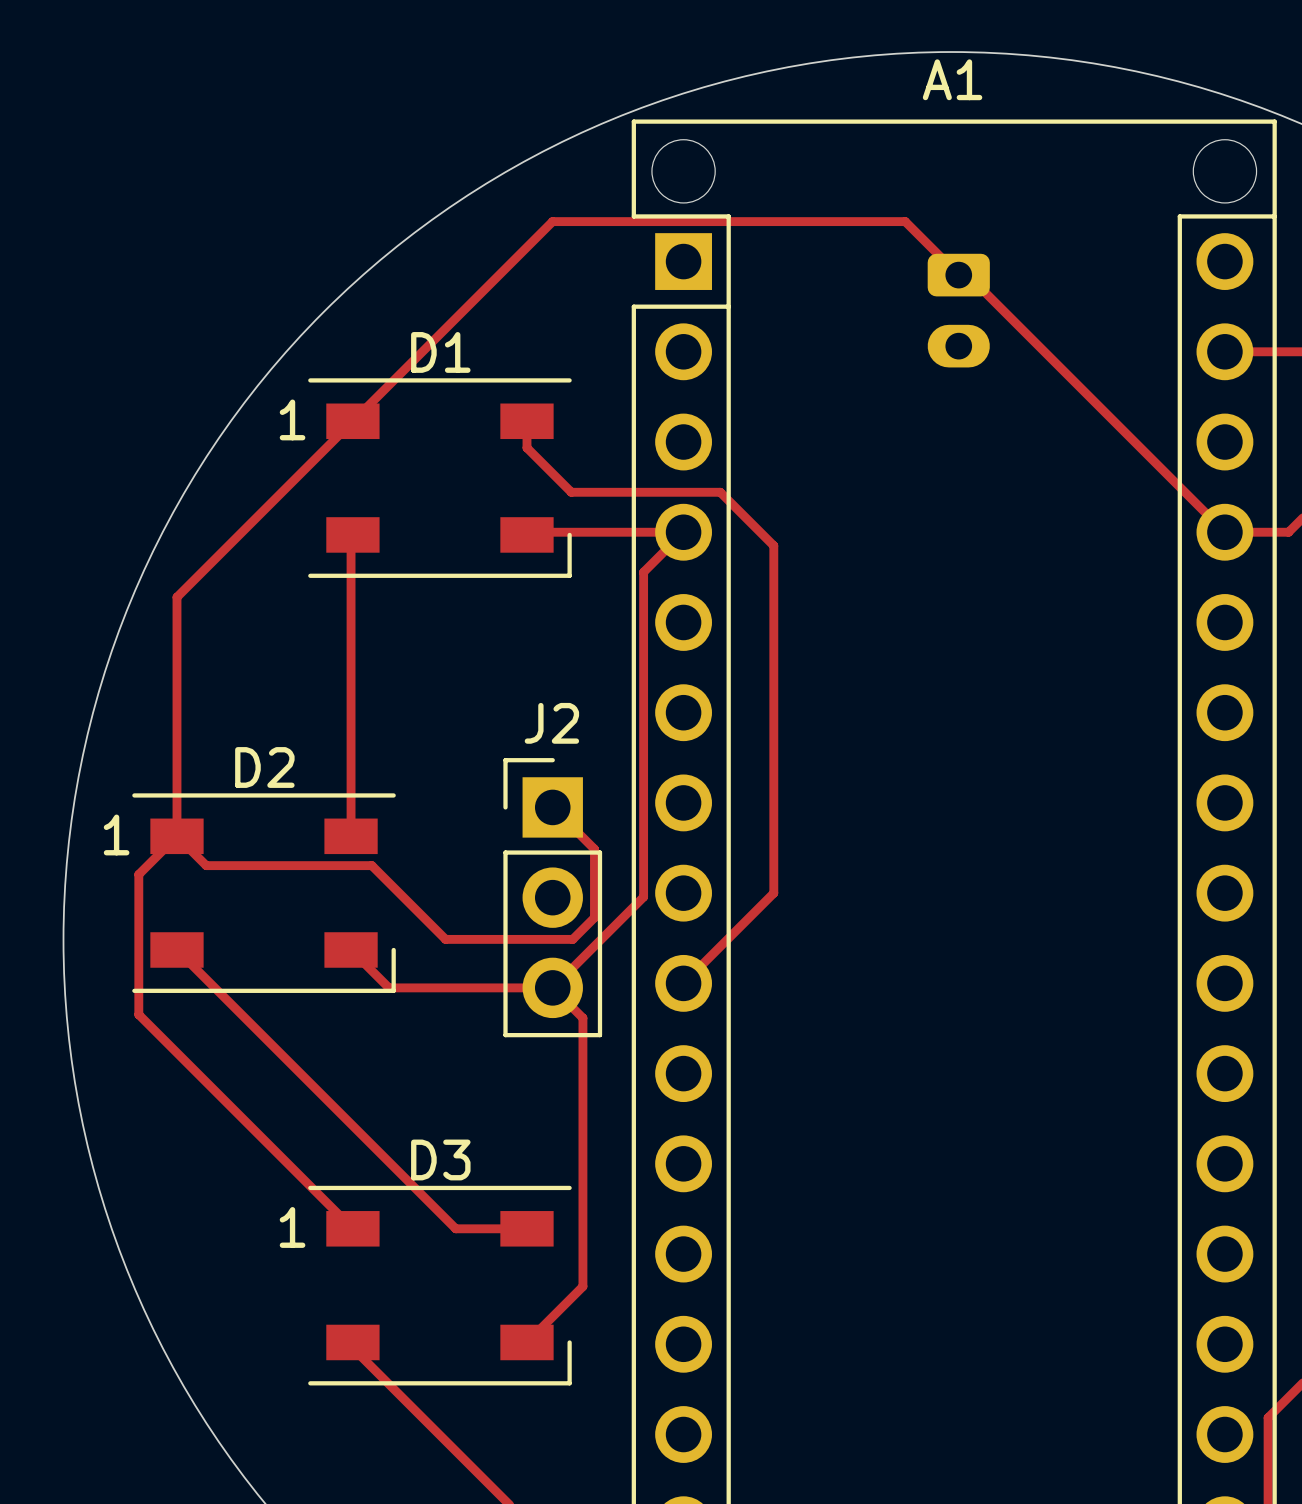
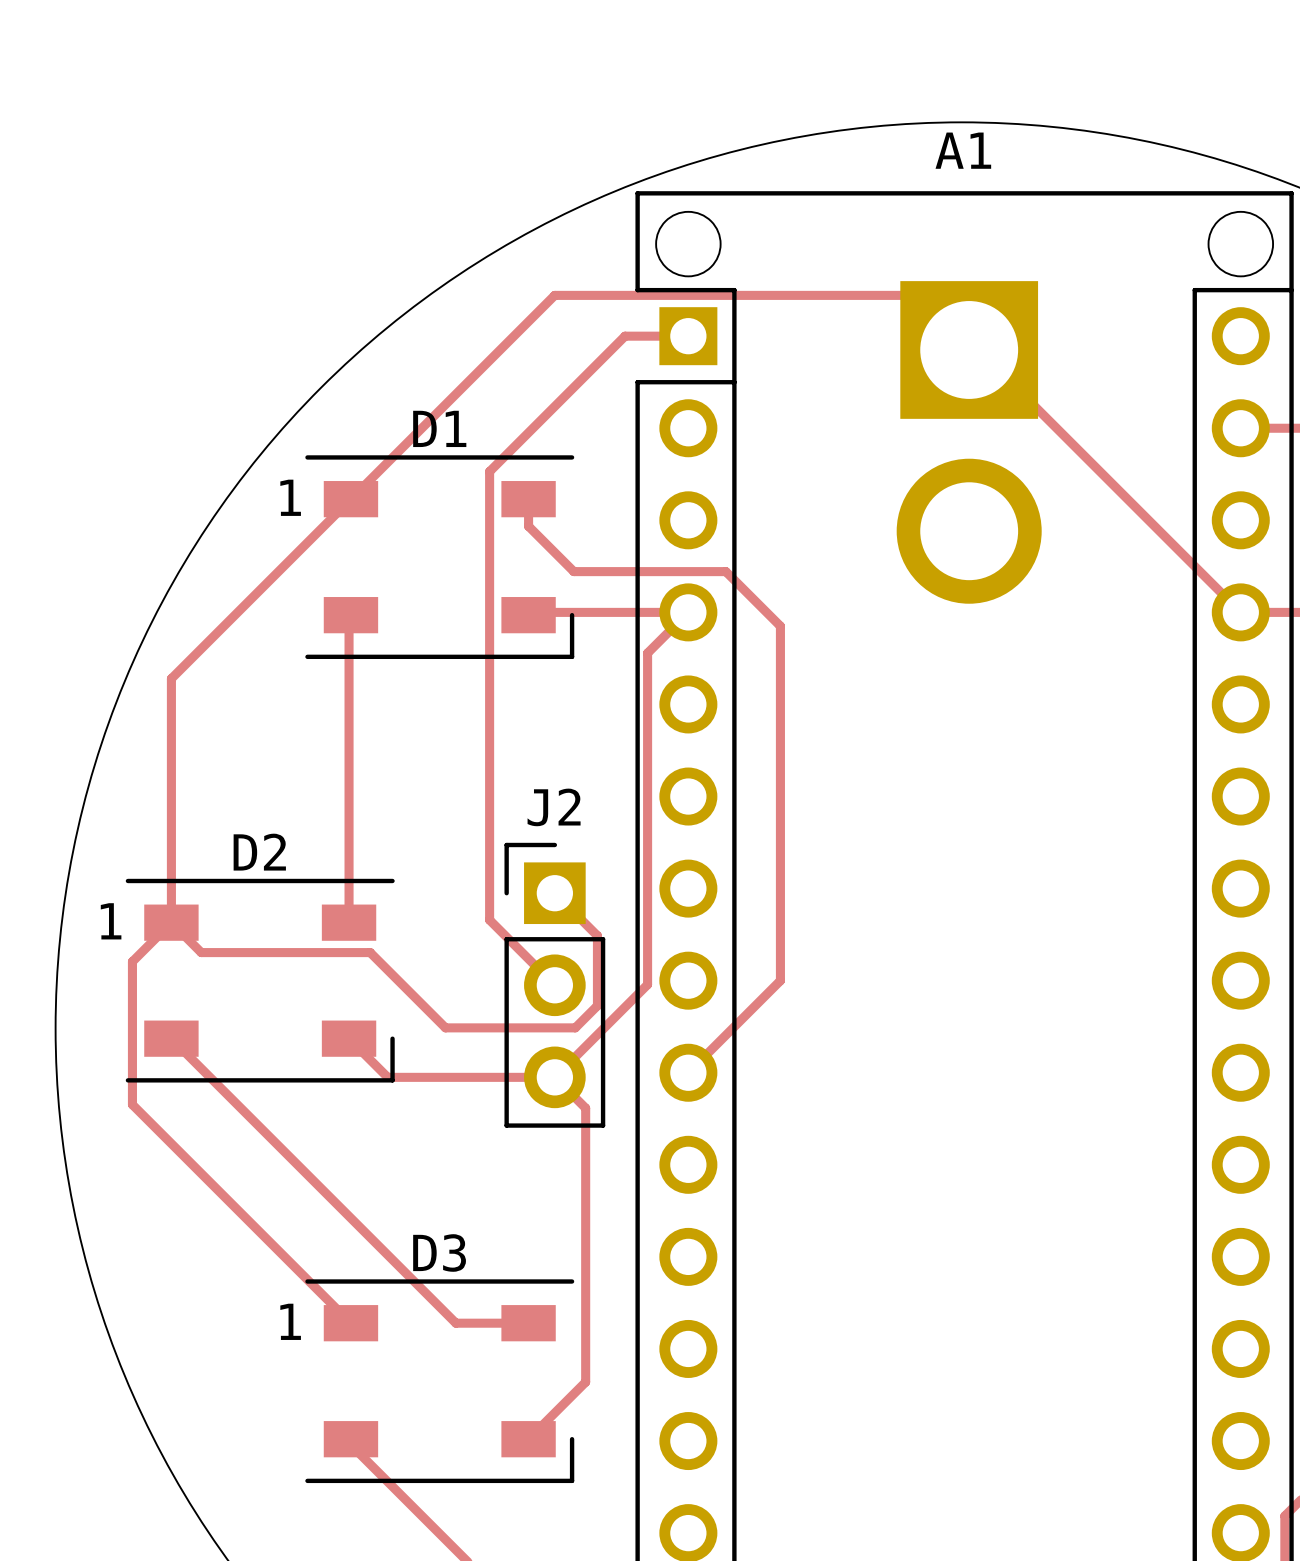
track: none -> (688, 336) (625, 336) (489, 471) (489, 920) (554, 985)
part: (958, 310) -> none
part: none -> (969, 442)

